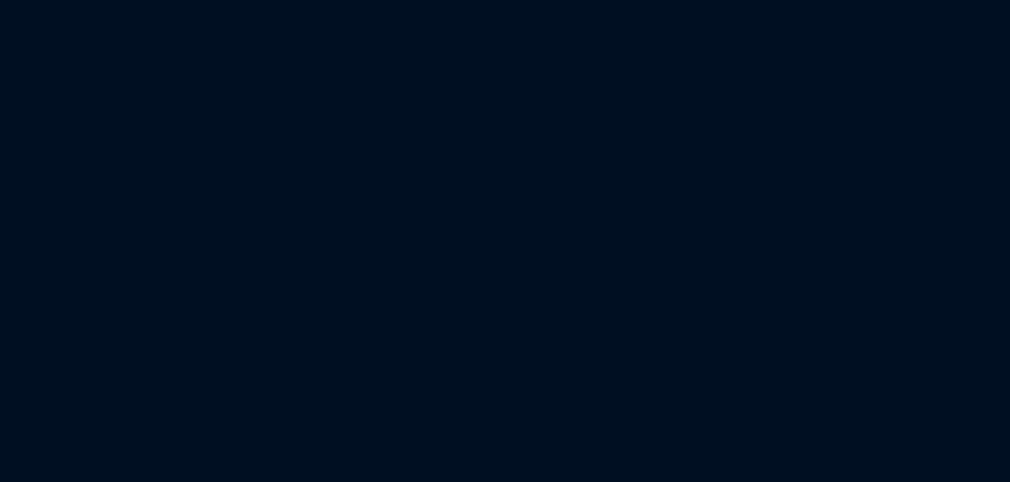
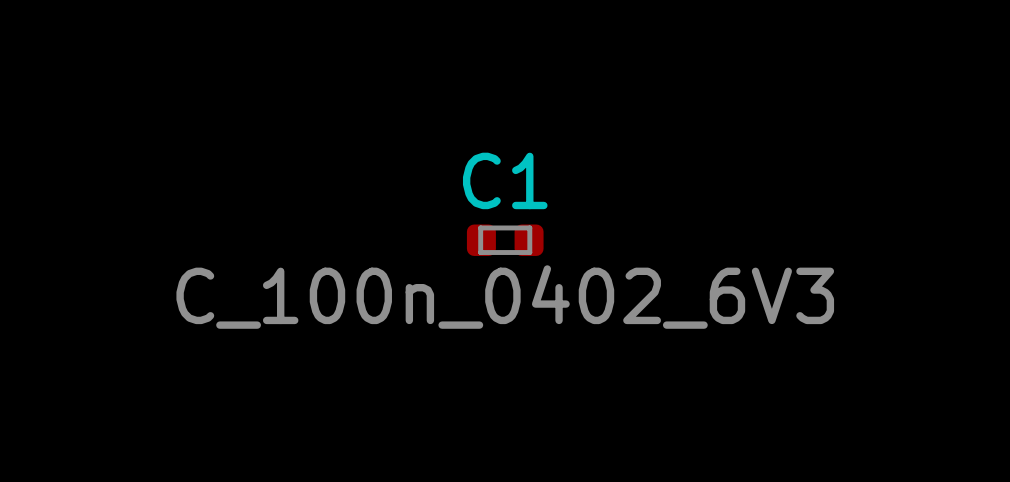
C1: none -> C_100n_0402_6V3 (505, 240)

